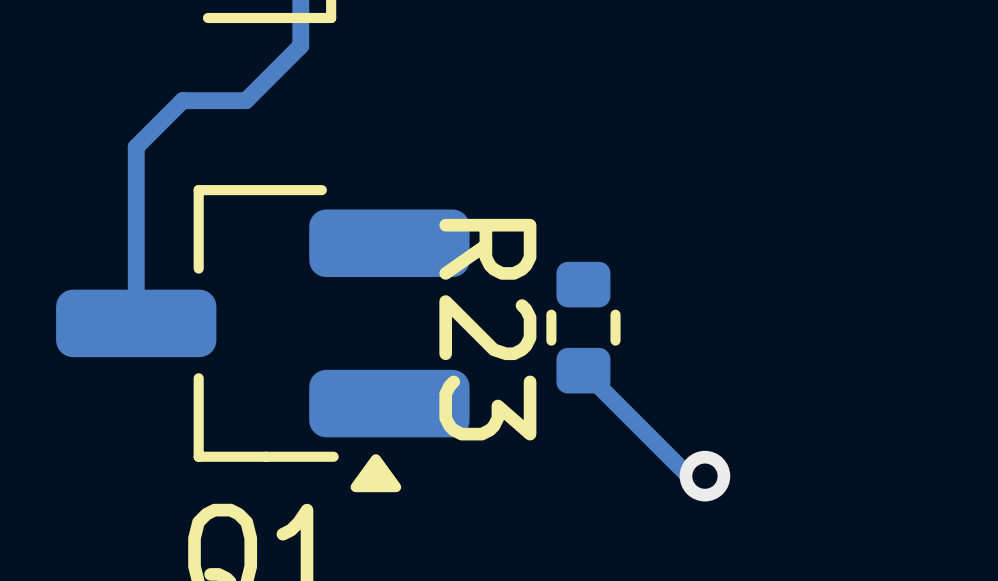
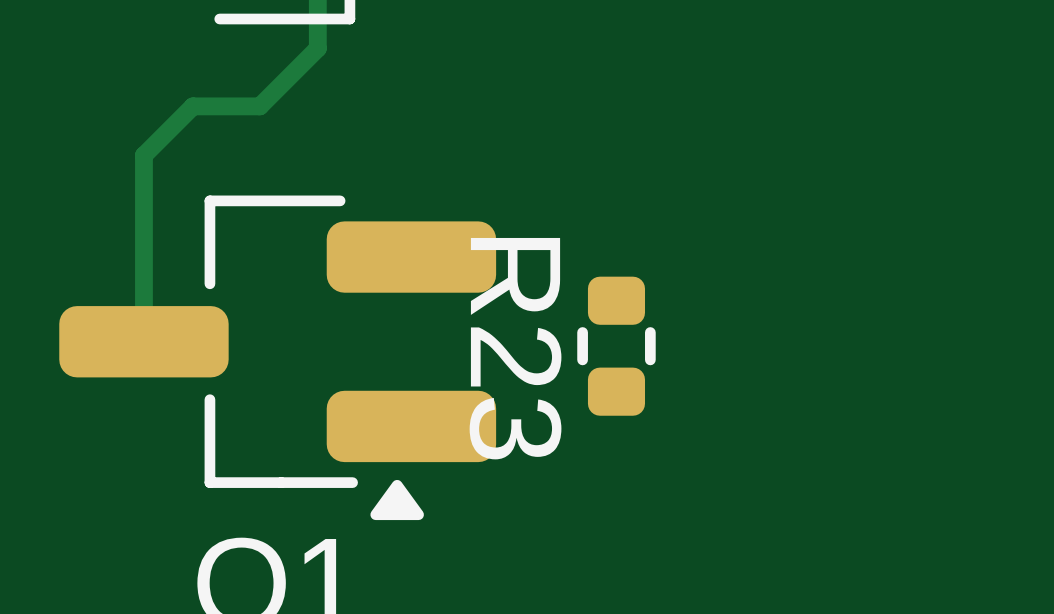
track: (583, 370) (688, 476) (704, 476) -> none
via: (704, 476) -> none

